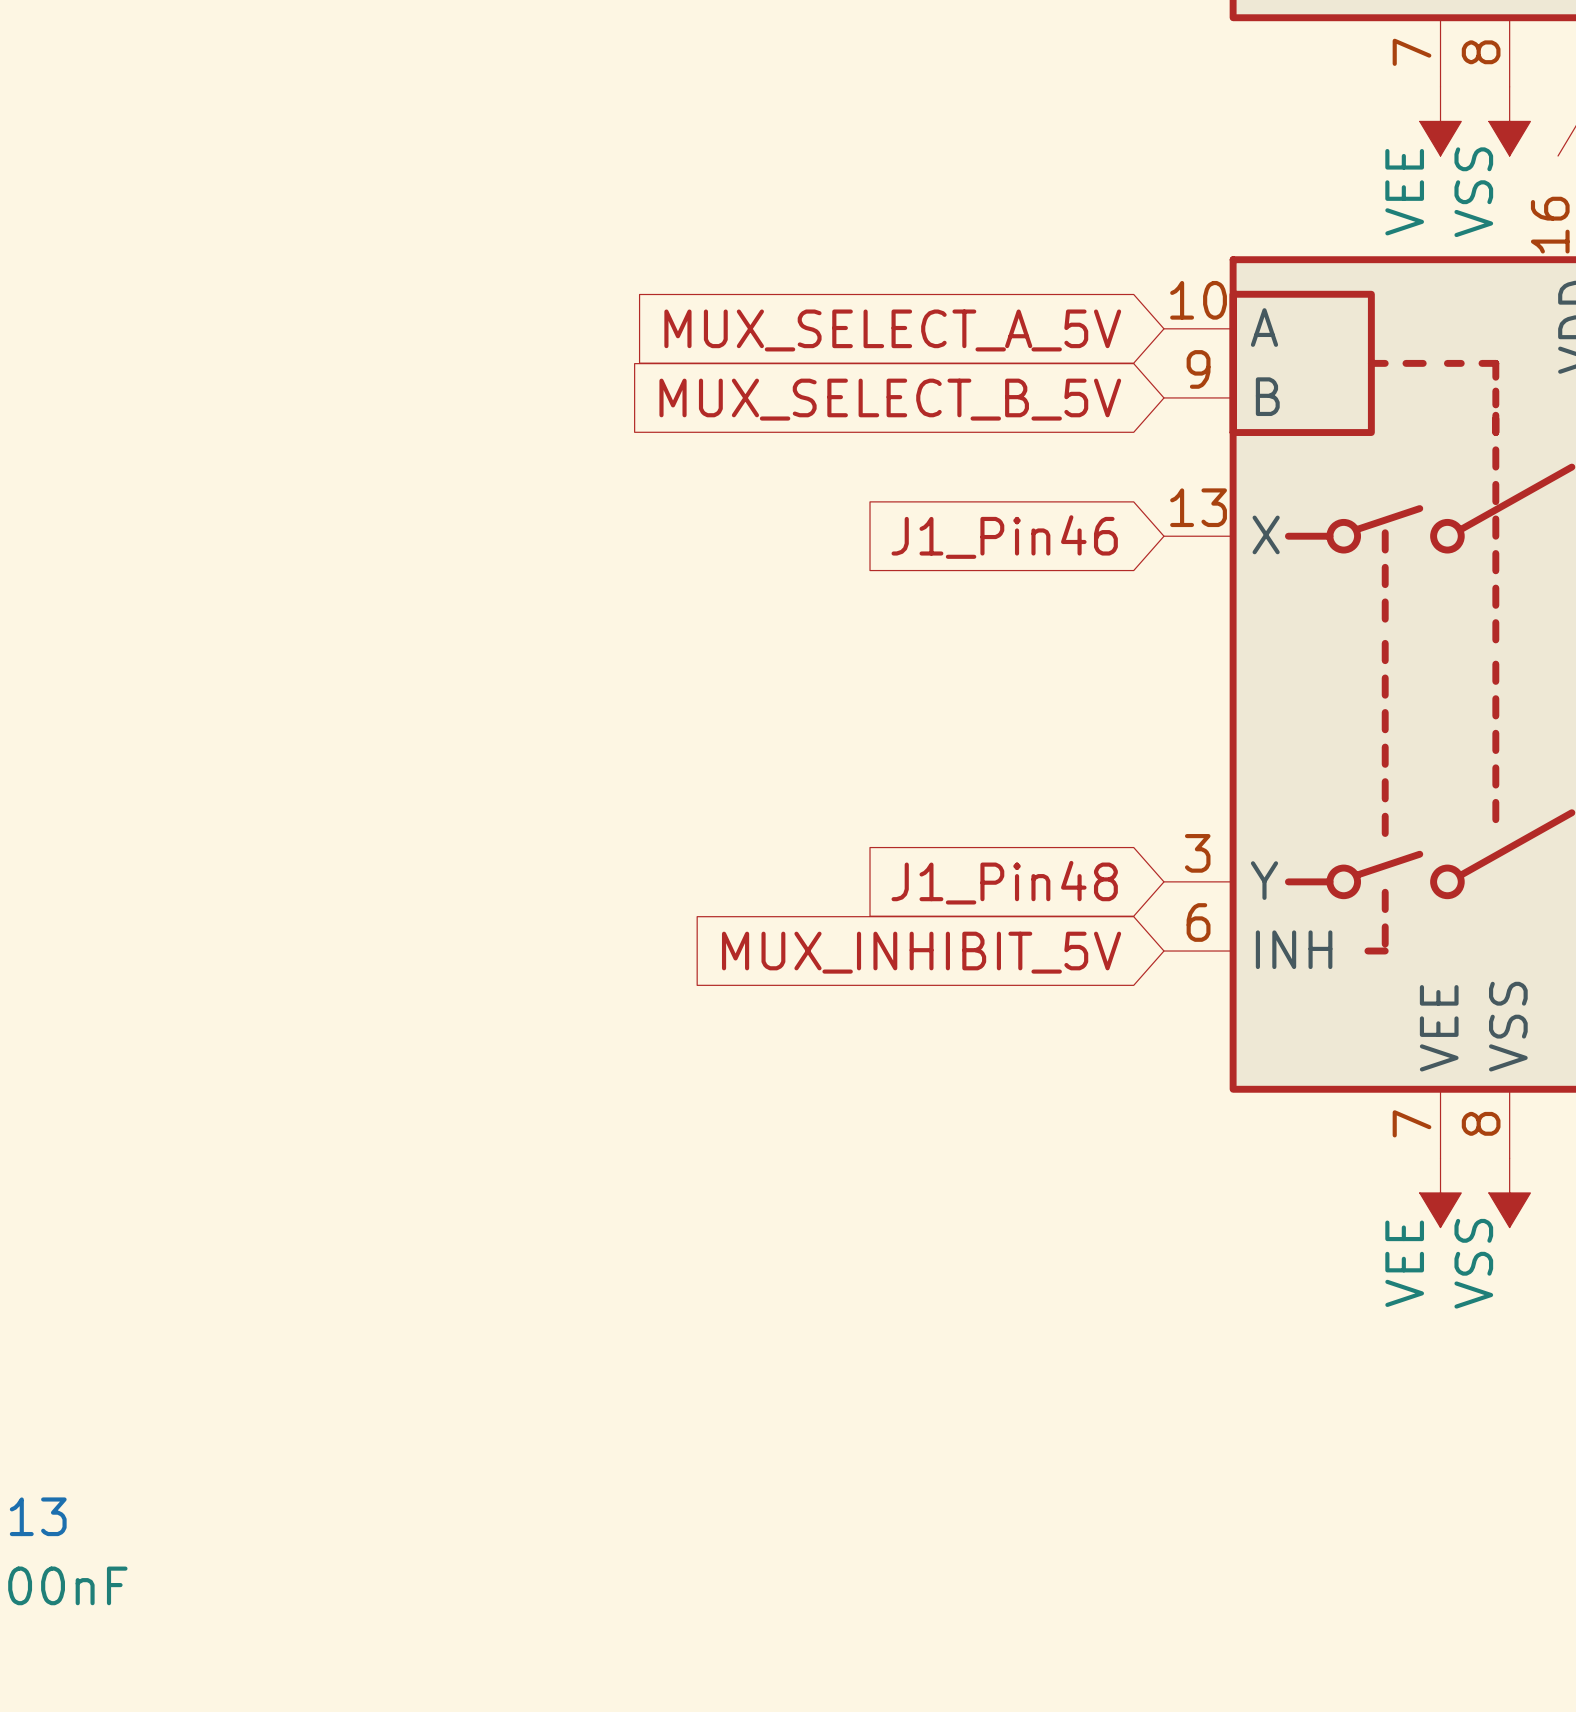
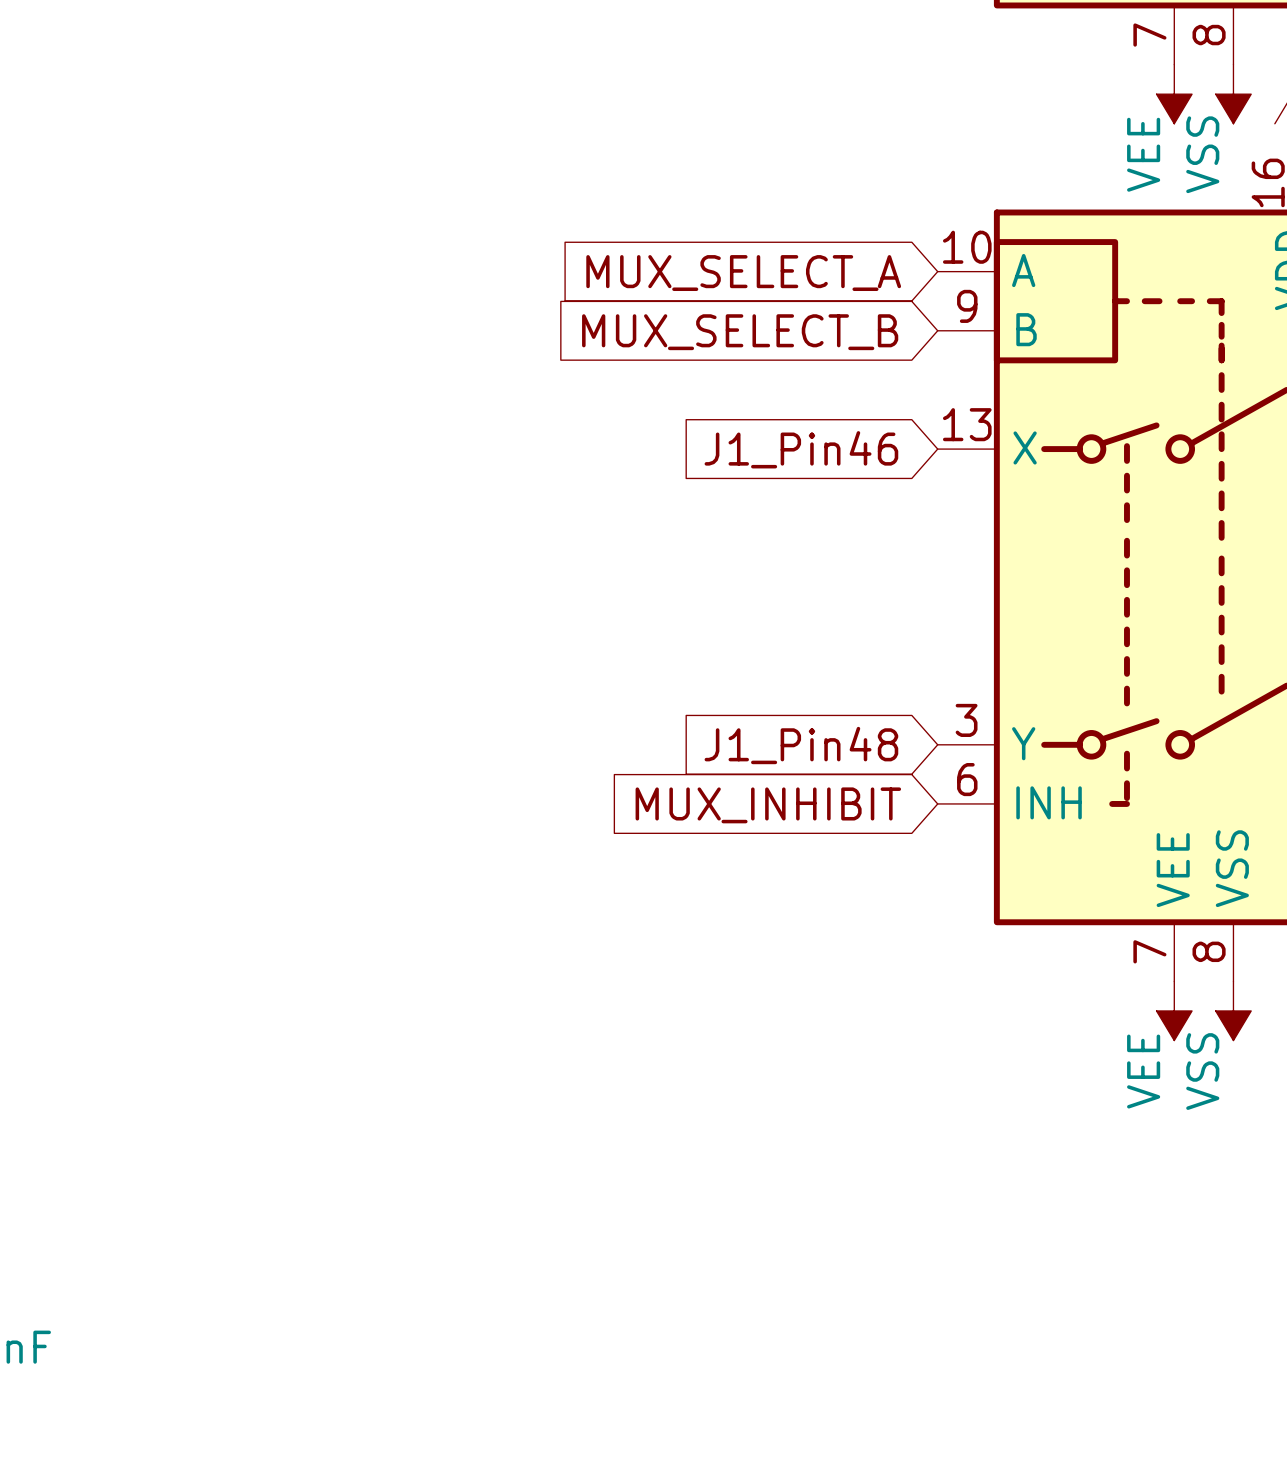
global label: MUX_SELECT_A_5V (892, 330) -> MUX_SELECT_A (743, 273)
global label: MUX_SELECT_B_5V (890, 399) -> MUX_SELECT_B (740, 332)
global label: MUX_INHIBIT_5V (921, 952) -> MUX_INHIBIT (768, 805)

